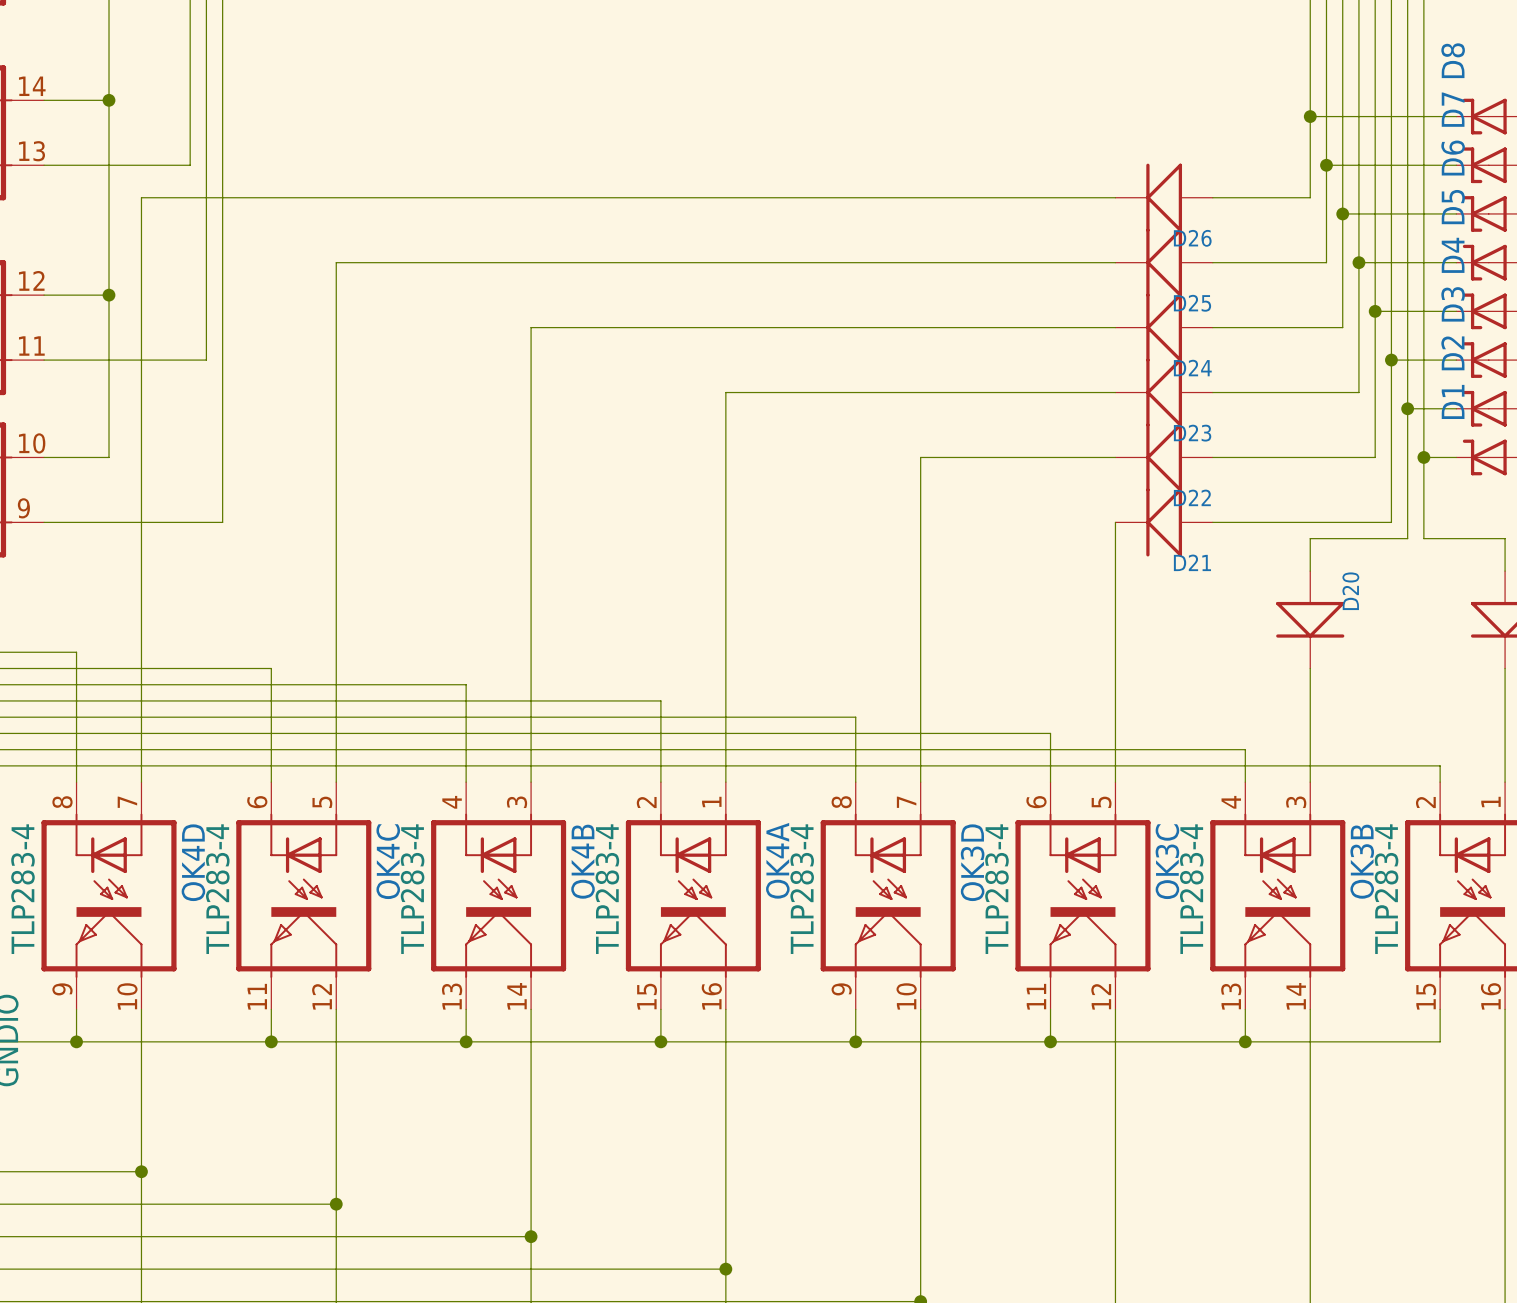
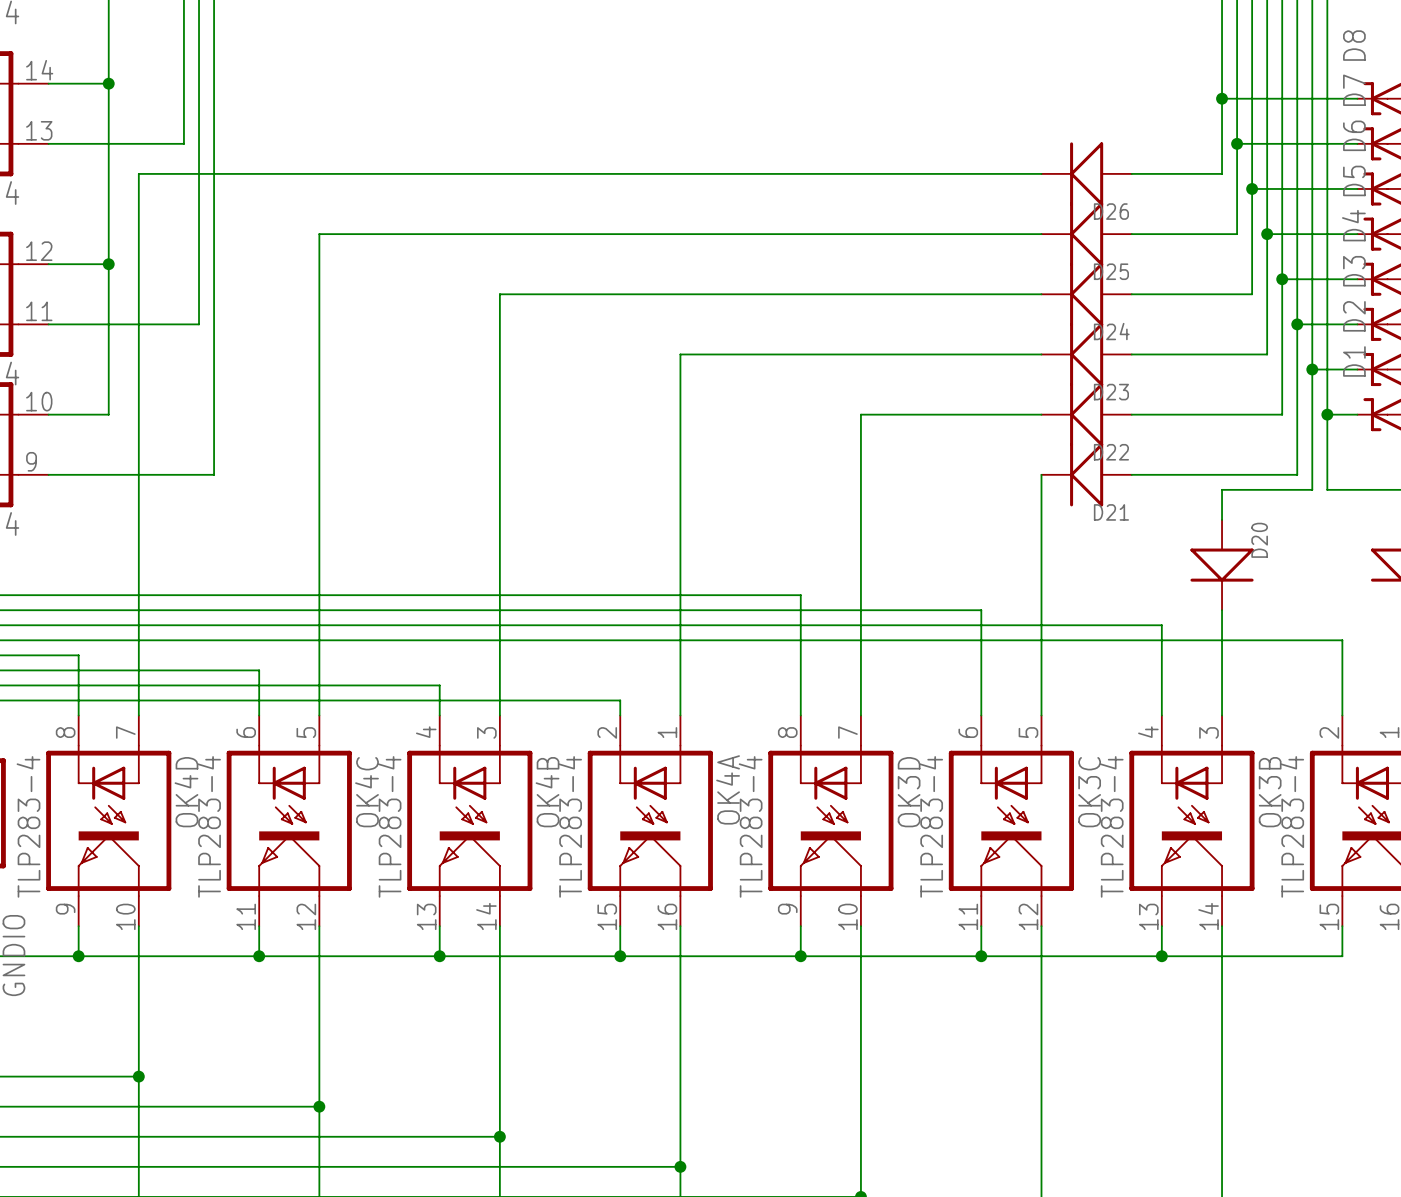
wire: (76, 652) (76, 717) (855, 717) -> (78, 595) (800, 595) (800, 655)
wire: (271, 668) (271, 733) (1050, 733) -> (259, 610) (981, 610) (981, 670)
wire: (466, 684) (466, 749) (1245, 749) -> (439, 625) (1161, 625) (1161, 685)
wire: (660, 700) (660, 765) (1440, 765) -> (620, 640) (1342, 640) (1342, 700)

